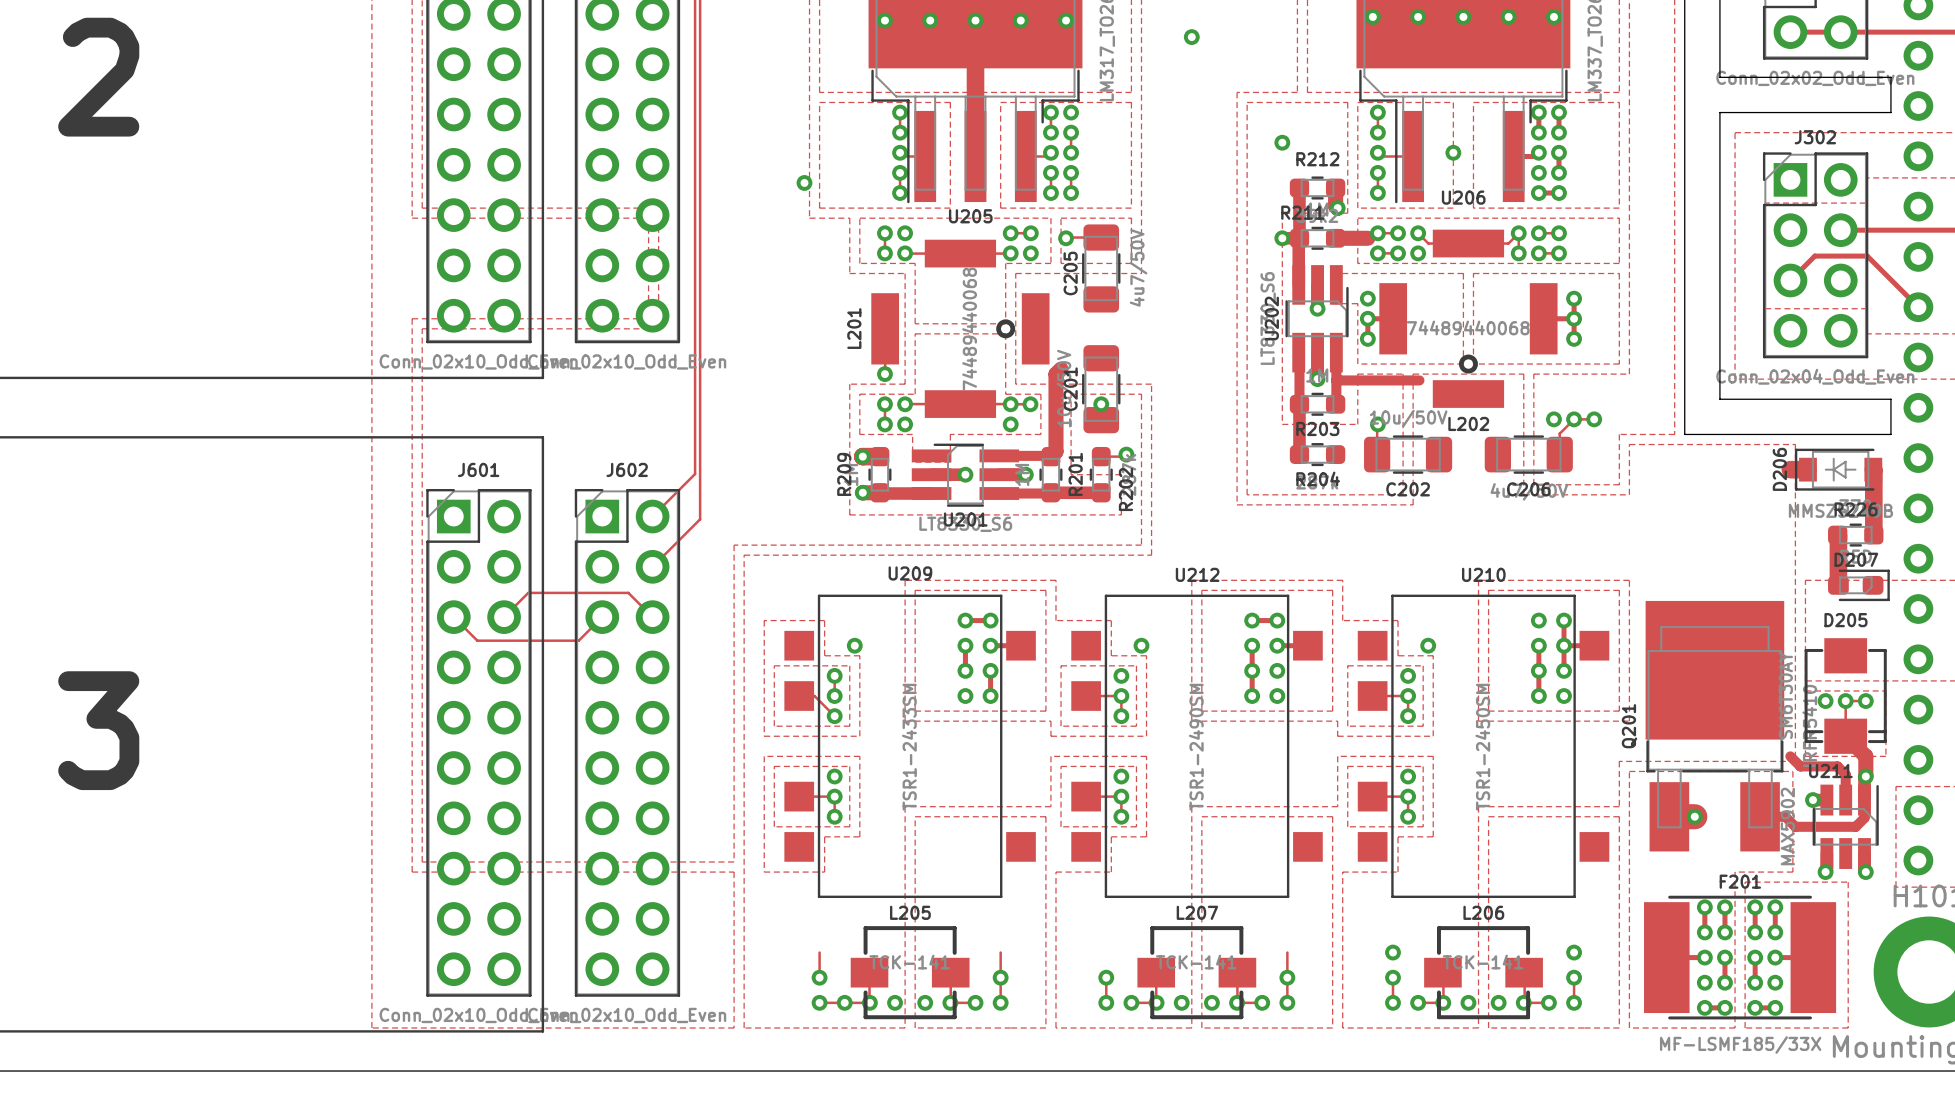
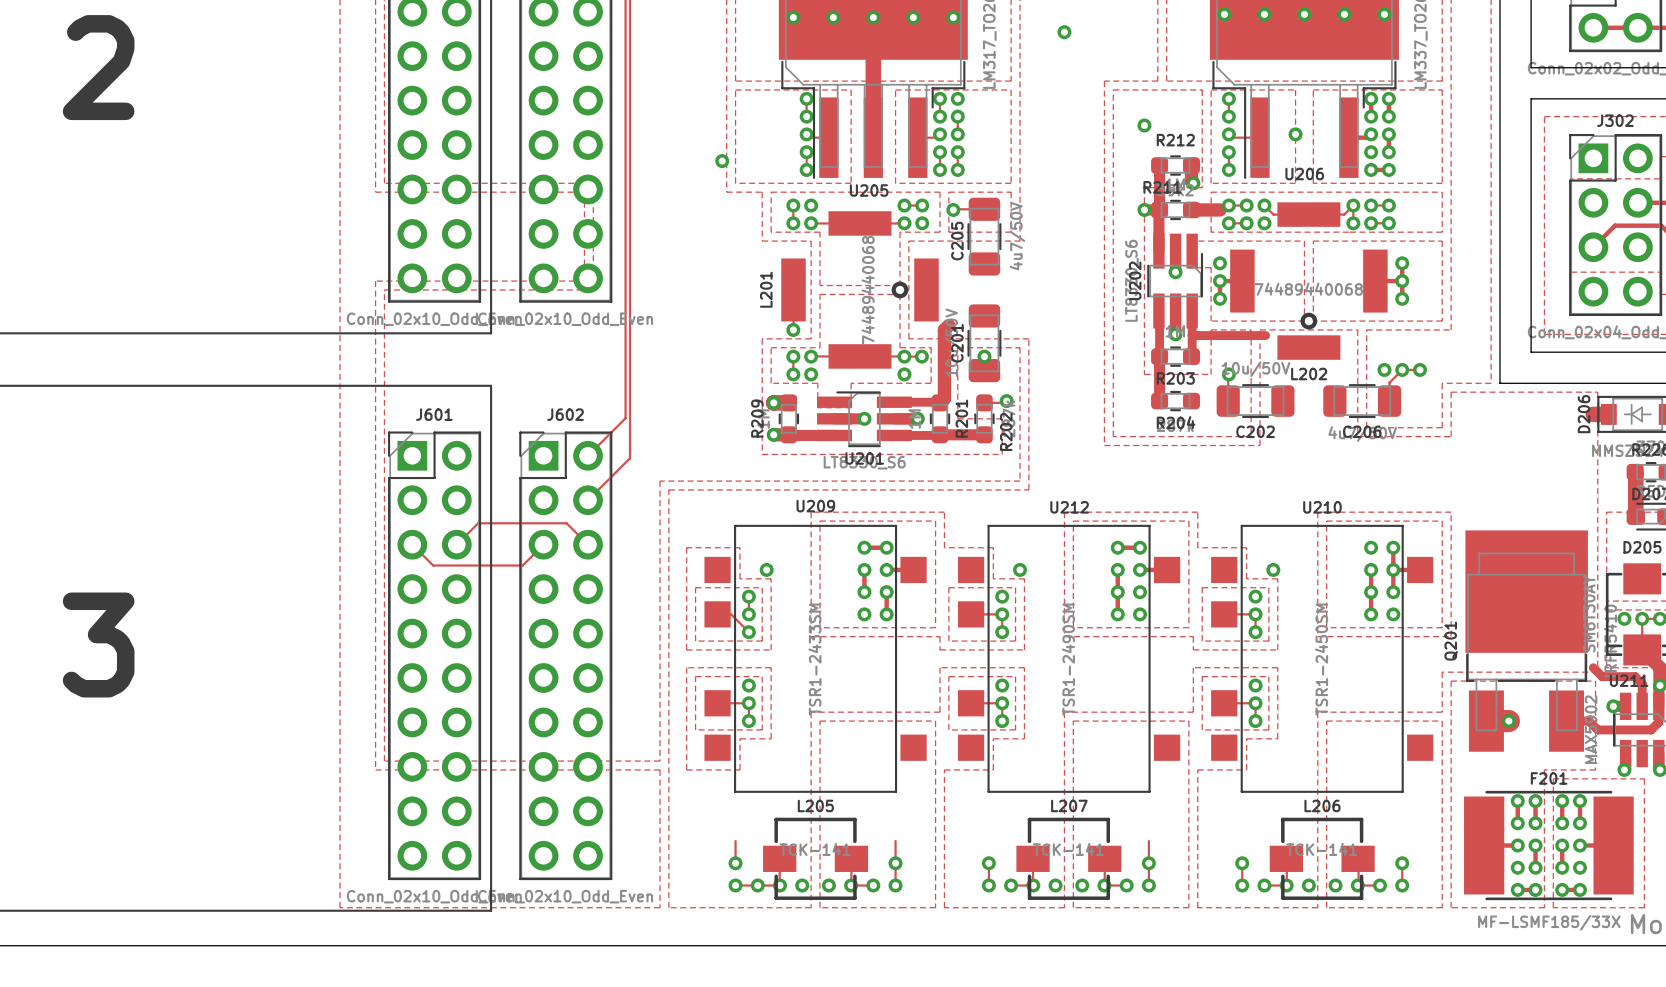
via: (1392, 952) -> none
via: (1574, 952) -> none

